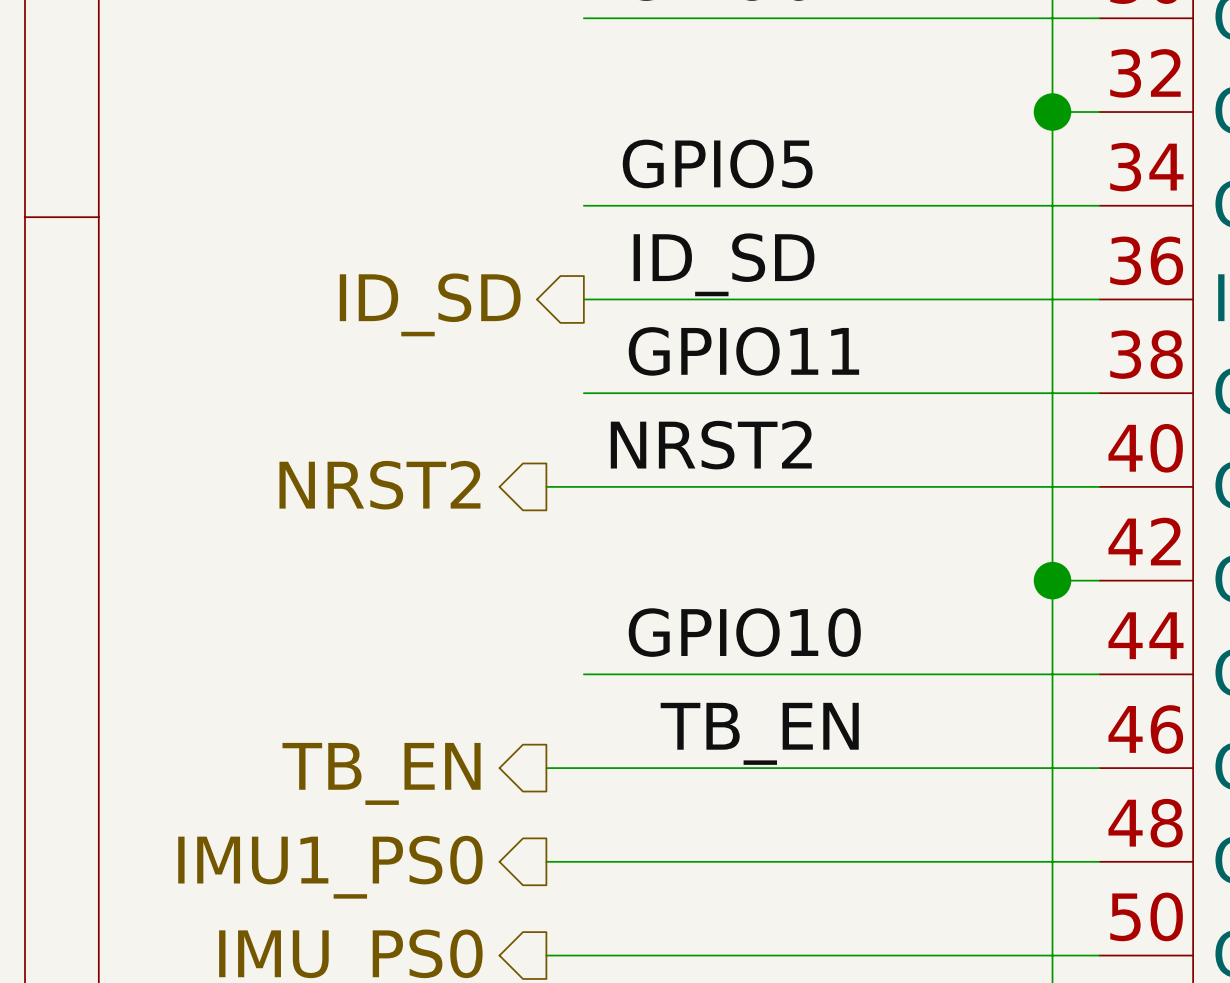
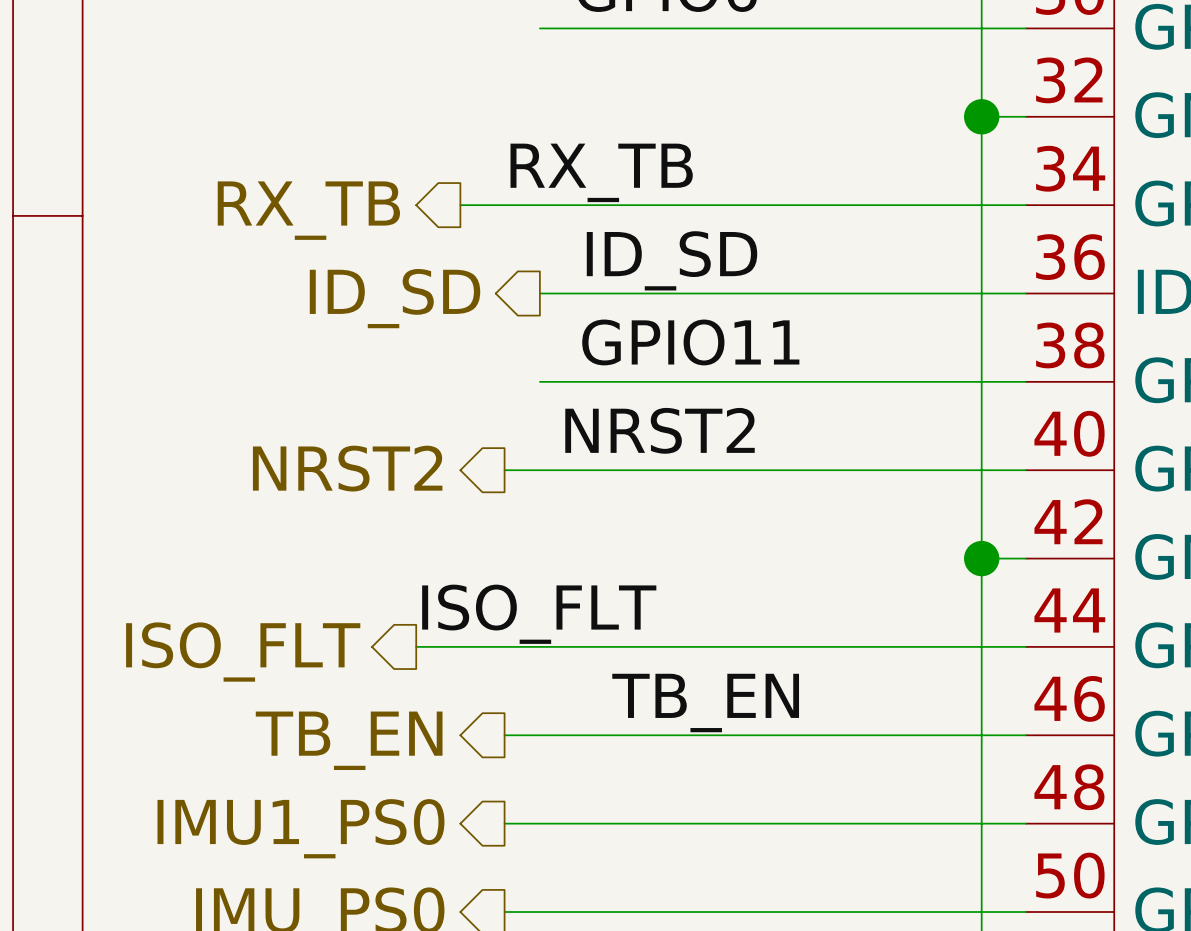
label: GPIO5 (717, 163) -> none
label: none -> RX_TB (601, 172)
wire: none -> (460, 205) (539, 205)
hierarchical label: none -> RX_TB (308, 210)
label: GPIO10 (744, 632) -> none
label: none -> ISO_FLT (539, 614)
wire: none -> (416, 646) (539, 646)
hierarchical label: none -> ISO_FLT (243, 652)

